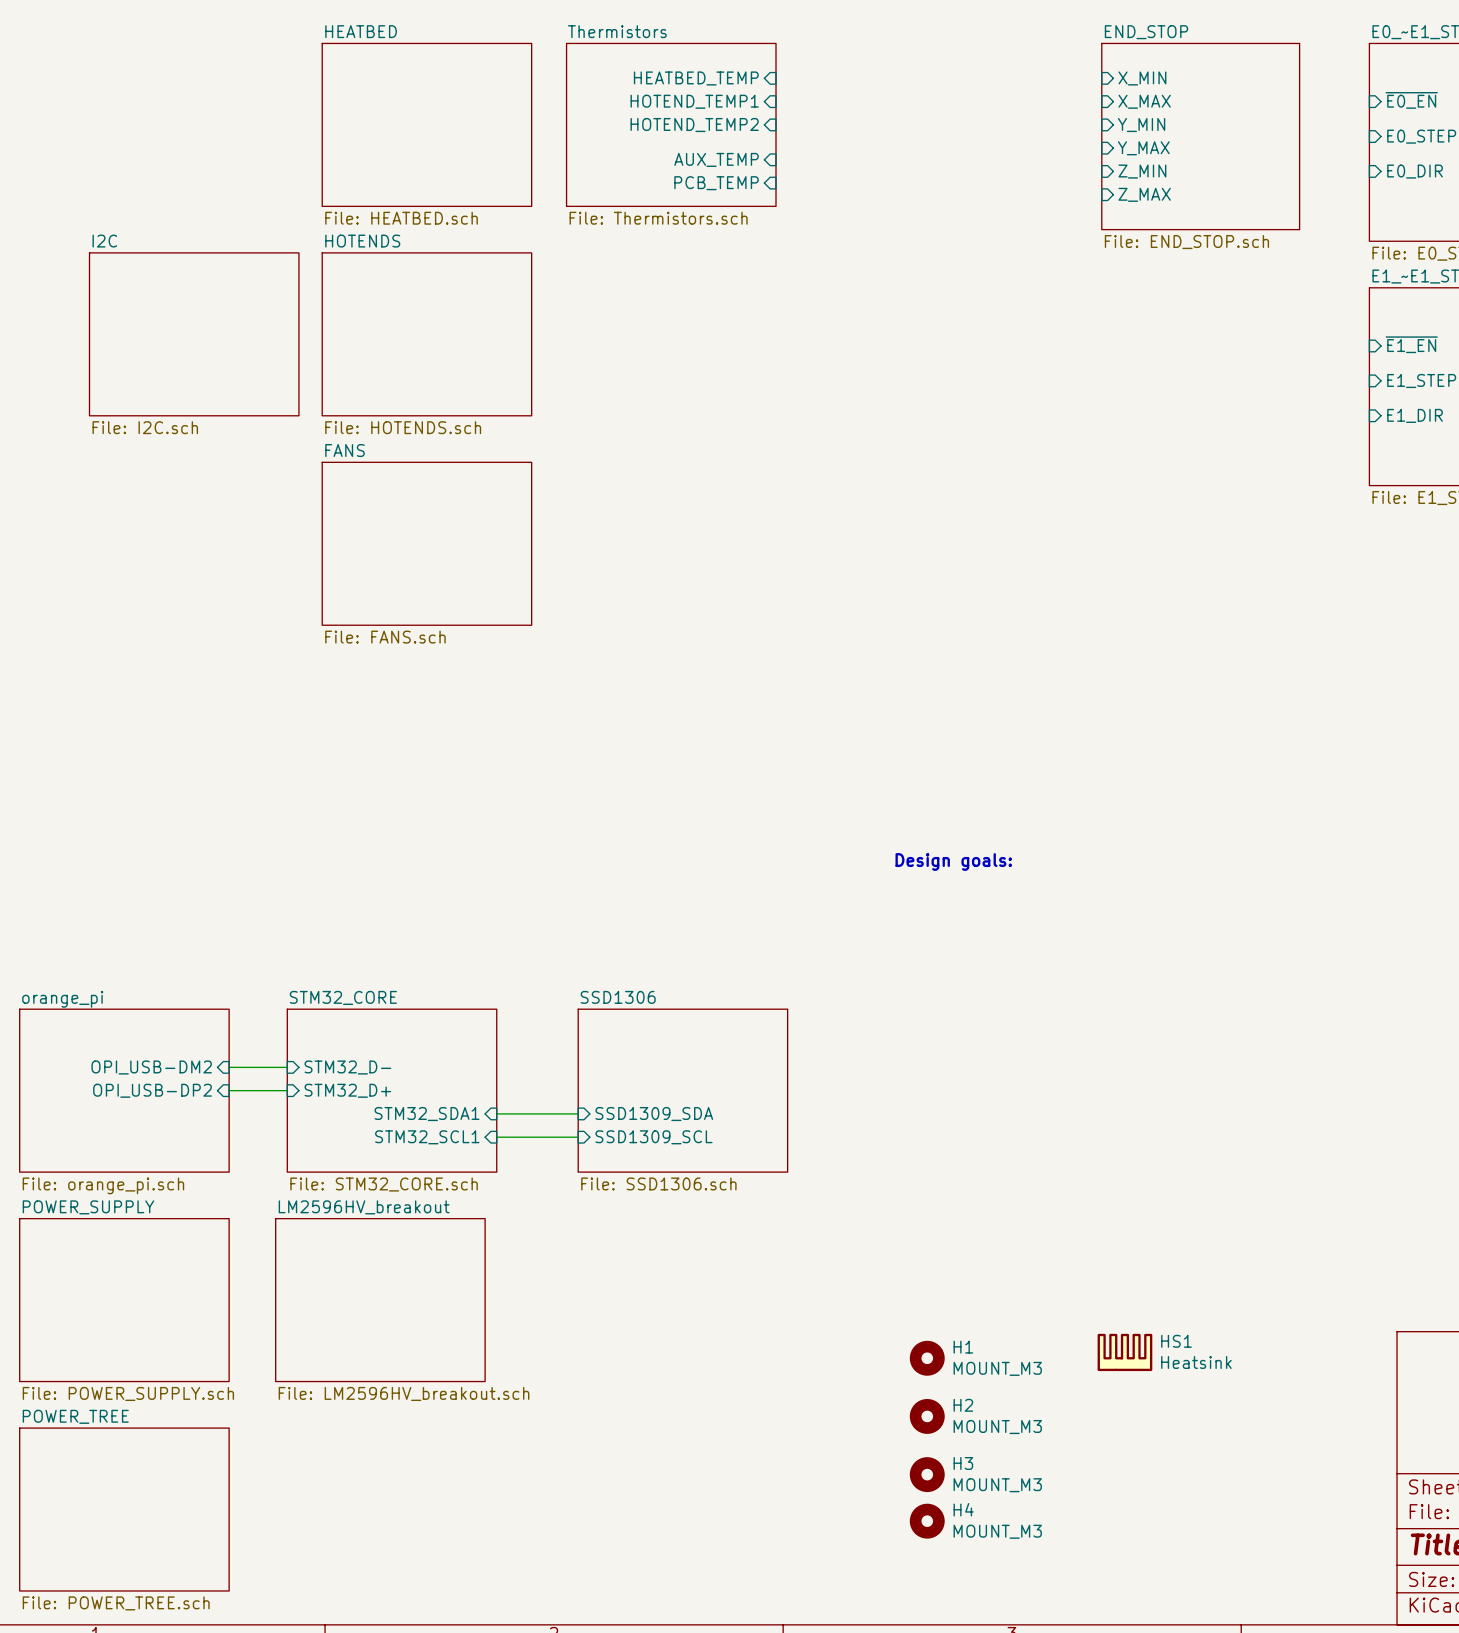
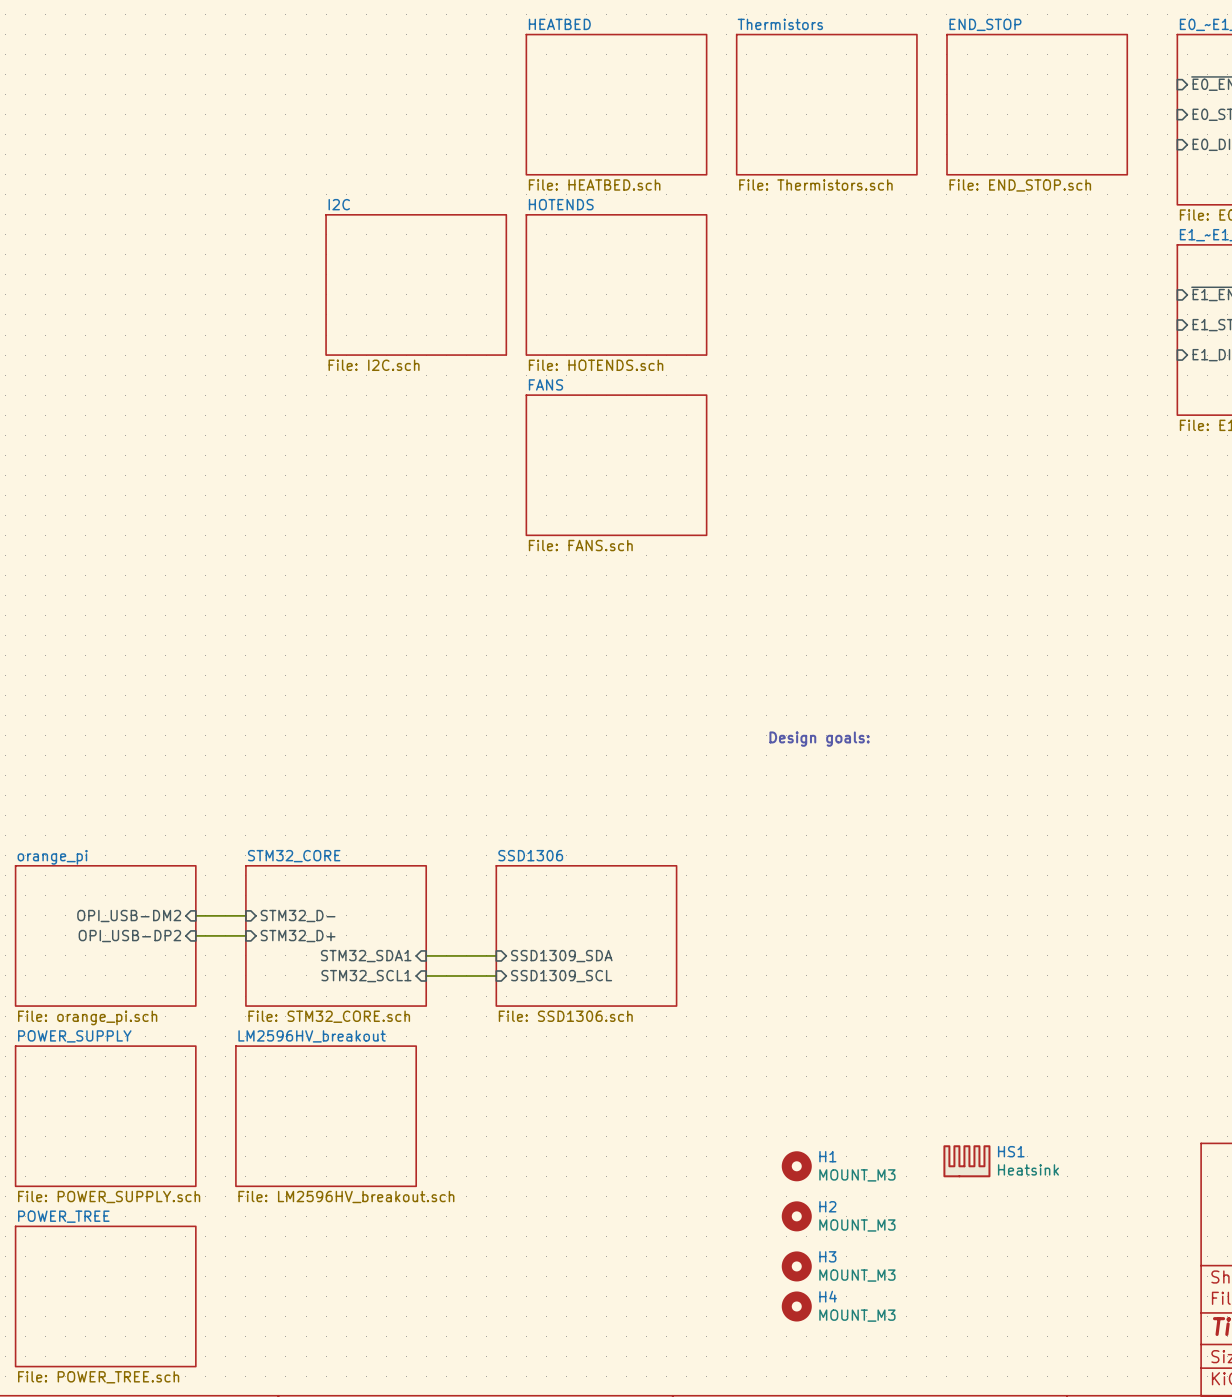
sheet pin: HEATBED_TEMP (696, 78) -> none
sheet pin: X_MIN (1142, 78) -> none
sheet pin: HOTEND_TEMP1 (694, 101) -> none
sheet pin: X_MAX (1144, 101) -> none
sheet HEATBED: File: HEATBED.sch (426, 124) -> none
sheet Thermistors: File: Thermistors.sch (671, 124) -> none
sheet HEATBED: none -> File: HEATBED.sch (616, 104)
sheet Thermistors: none -> File: Thermistors.sch (826, 104)
sheet END_STOP: none -> File: END_STOP.sch (1037, 104)
sheet pin: HOTEND_TEMP2 (694, 125) -> none
sheet pin: Y_MIN (1141, 125) -> none
sheet END_STOP: File: END_STOP.sch (1200, 136) -> none
sheet pin: Y_MAX (1143, 148) -> none
sheet pin: AUX_TEMP (716, 159) -> none
sheet pin: Z_MIN (1142, 171) -> none
sheet pin: PCB_TEMP (716, 183) -> none
sheet pin: Z_MAX (1144, 194) -> none
sheet I2C position: (194, 334) -> (416, 284)
sheet HOTENDS: File: HOTENDS.sch (426, 334) -> none
sheet HOTENDS: none -> File: HOTENDS.sch (616, 284)
sheet FANS: File: FANS.sch (426, 543) -> none
sheet FANS: none -> File: FANS.sch (616, 465)

